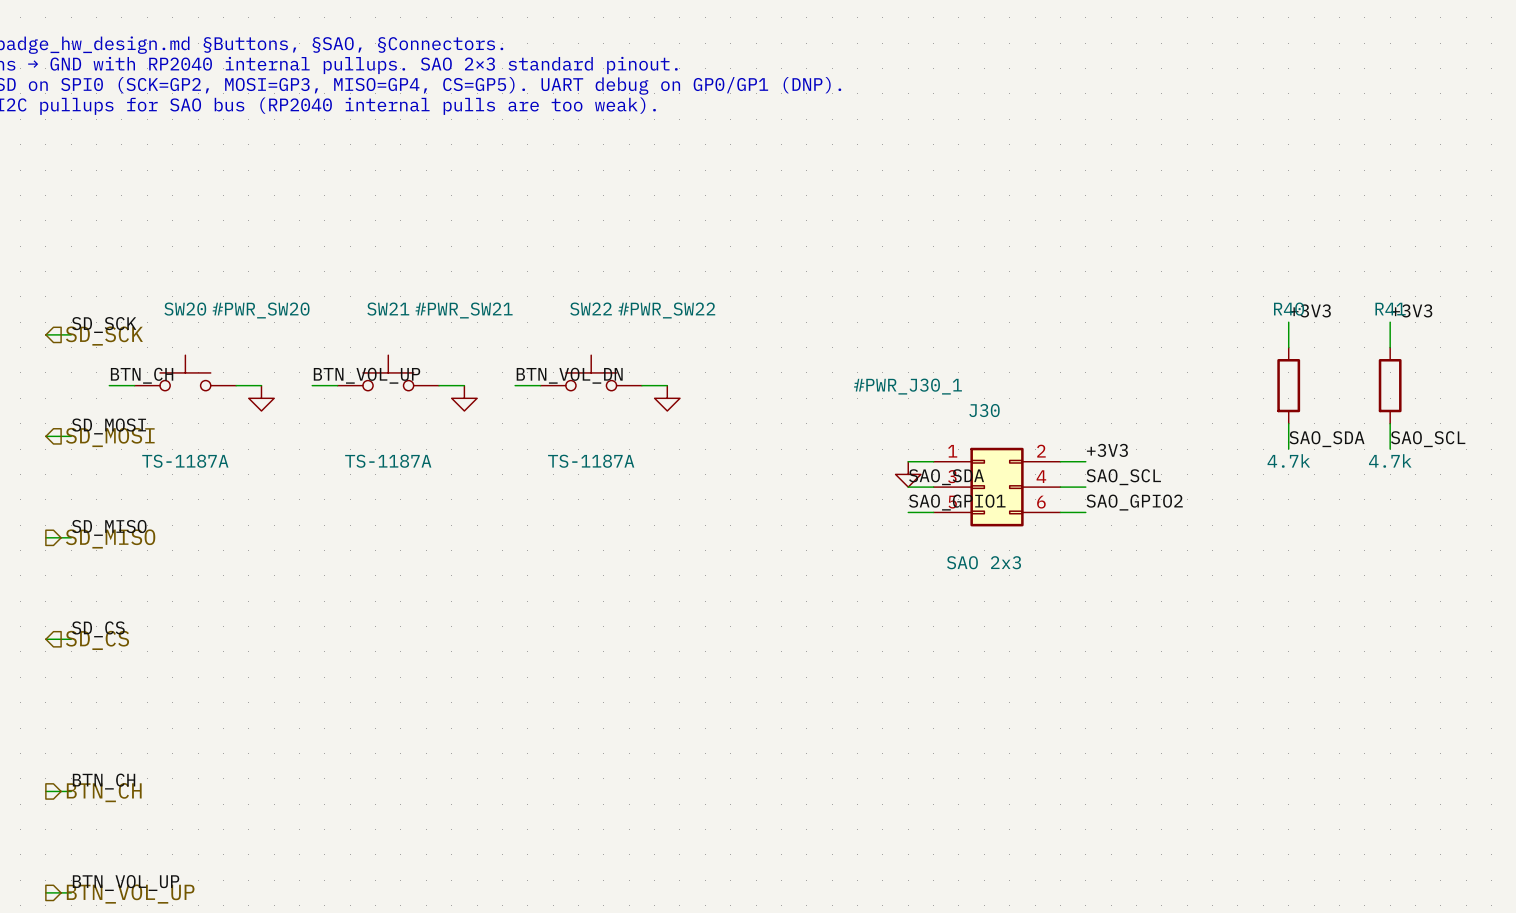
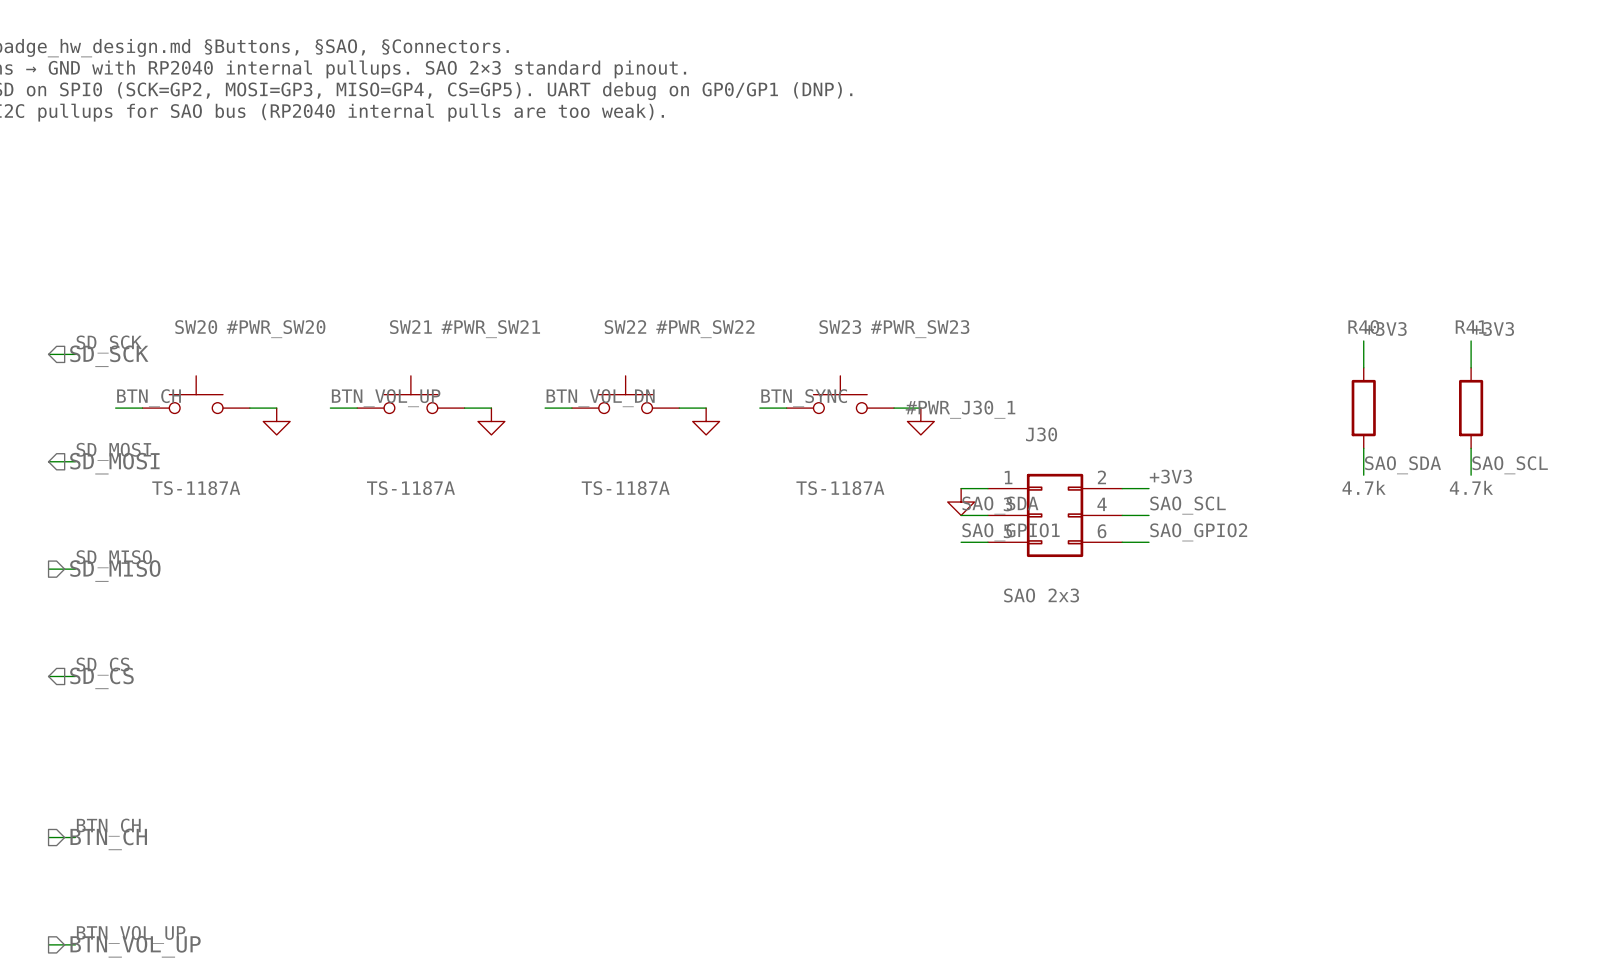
SW23: none -> TS-1187A (840, 394)
label: none -> BTN_SYNC (804, 398)
wire: none -> (759, 408) (786, 408)
wire: none -> (894, 408) (920, 408)
#PWR_SW23: none -> (920, 421)

